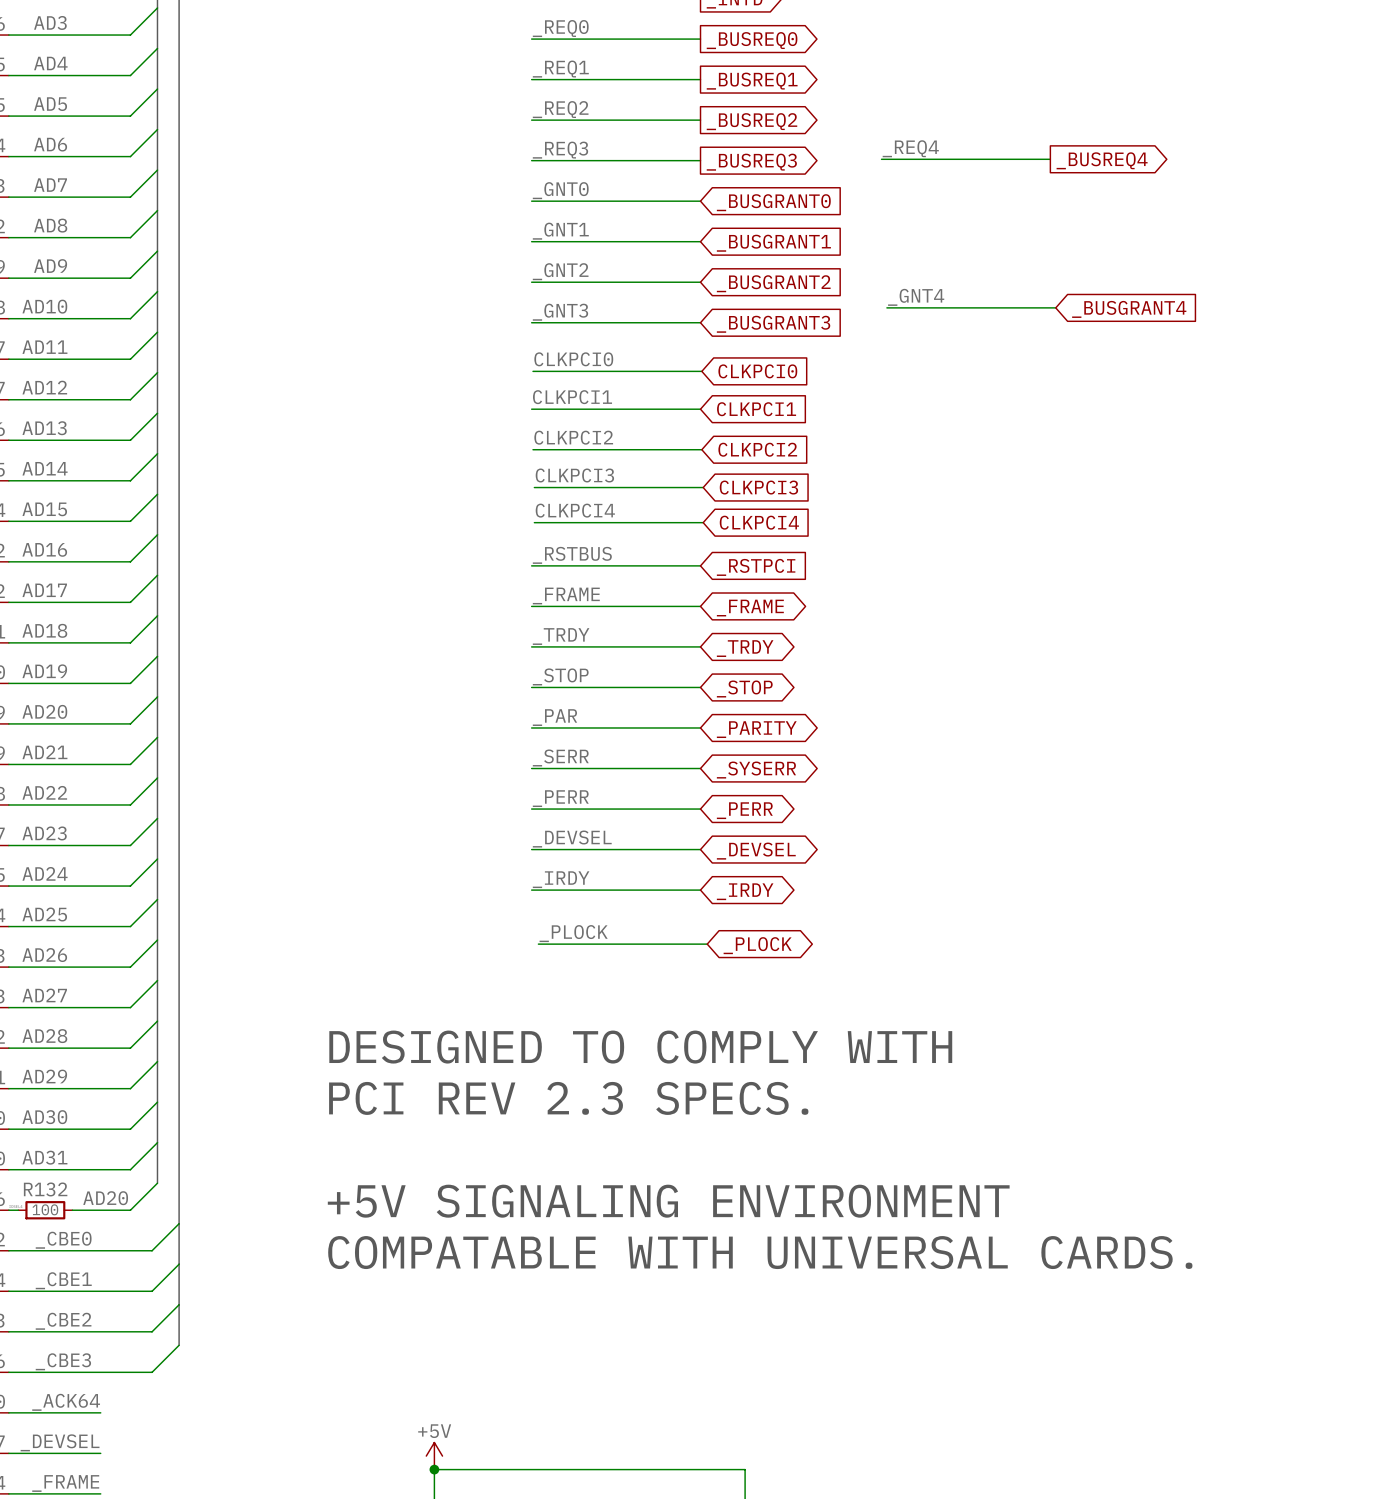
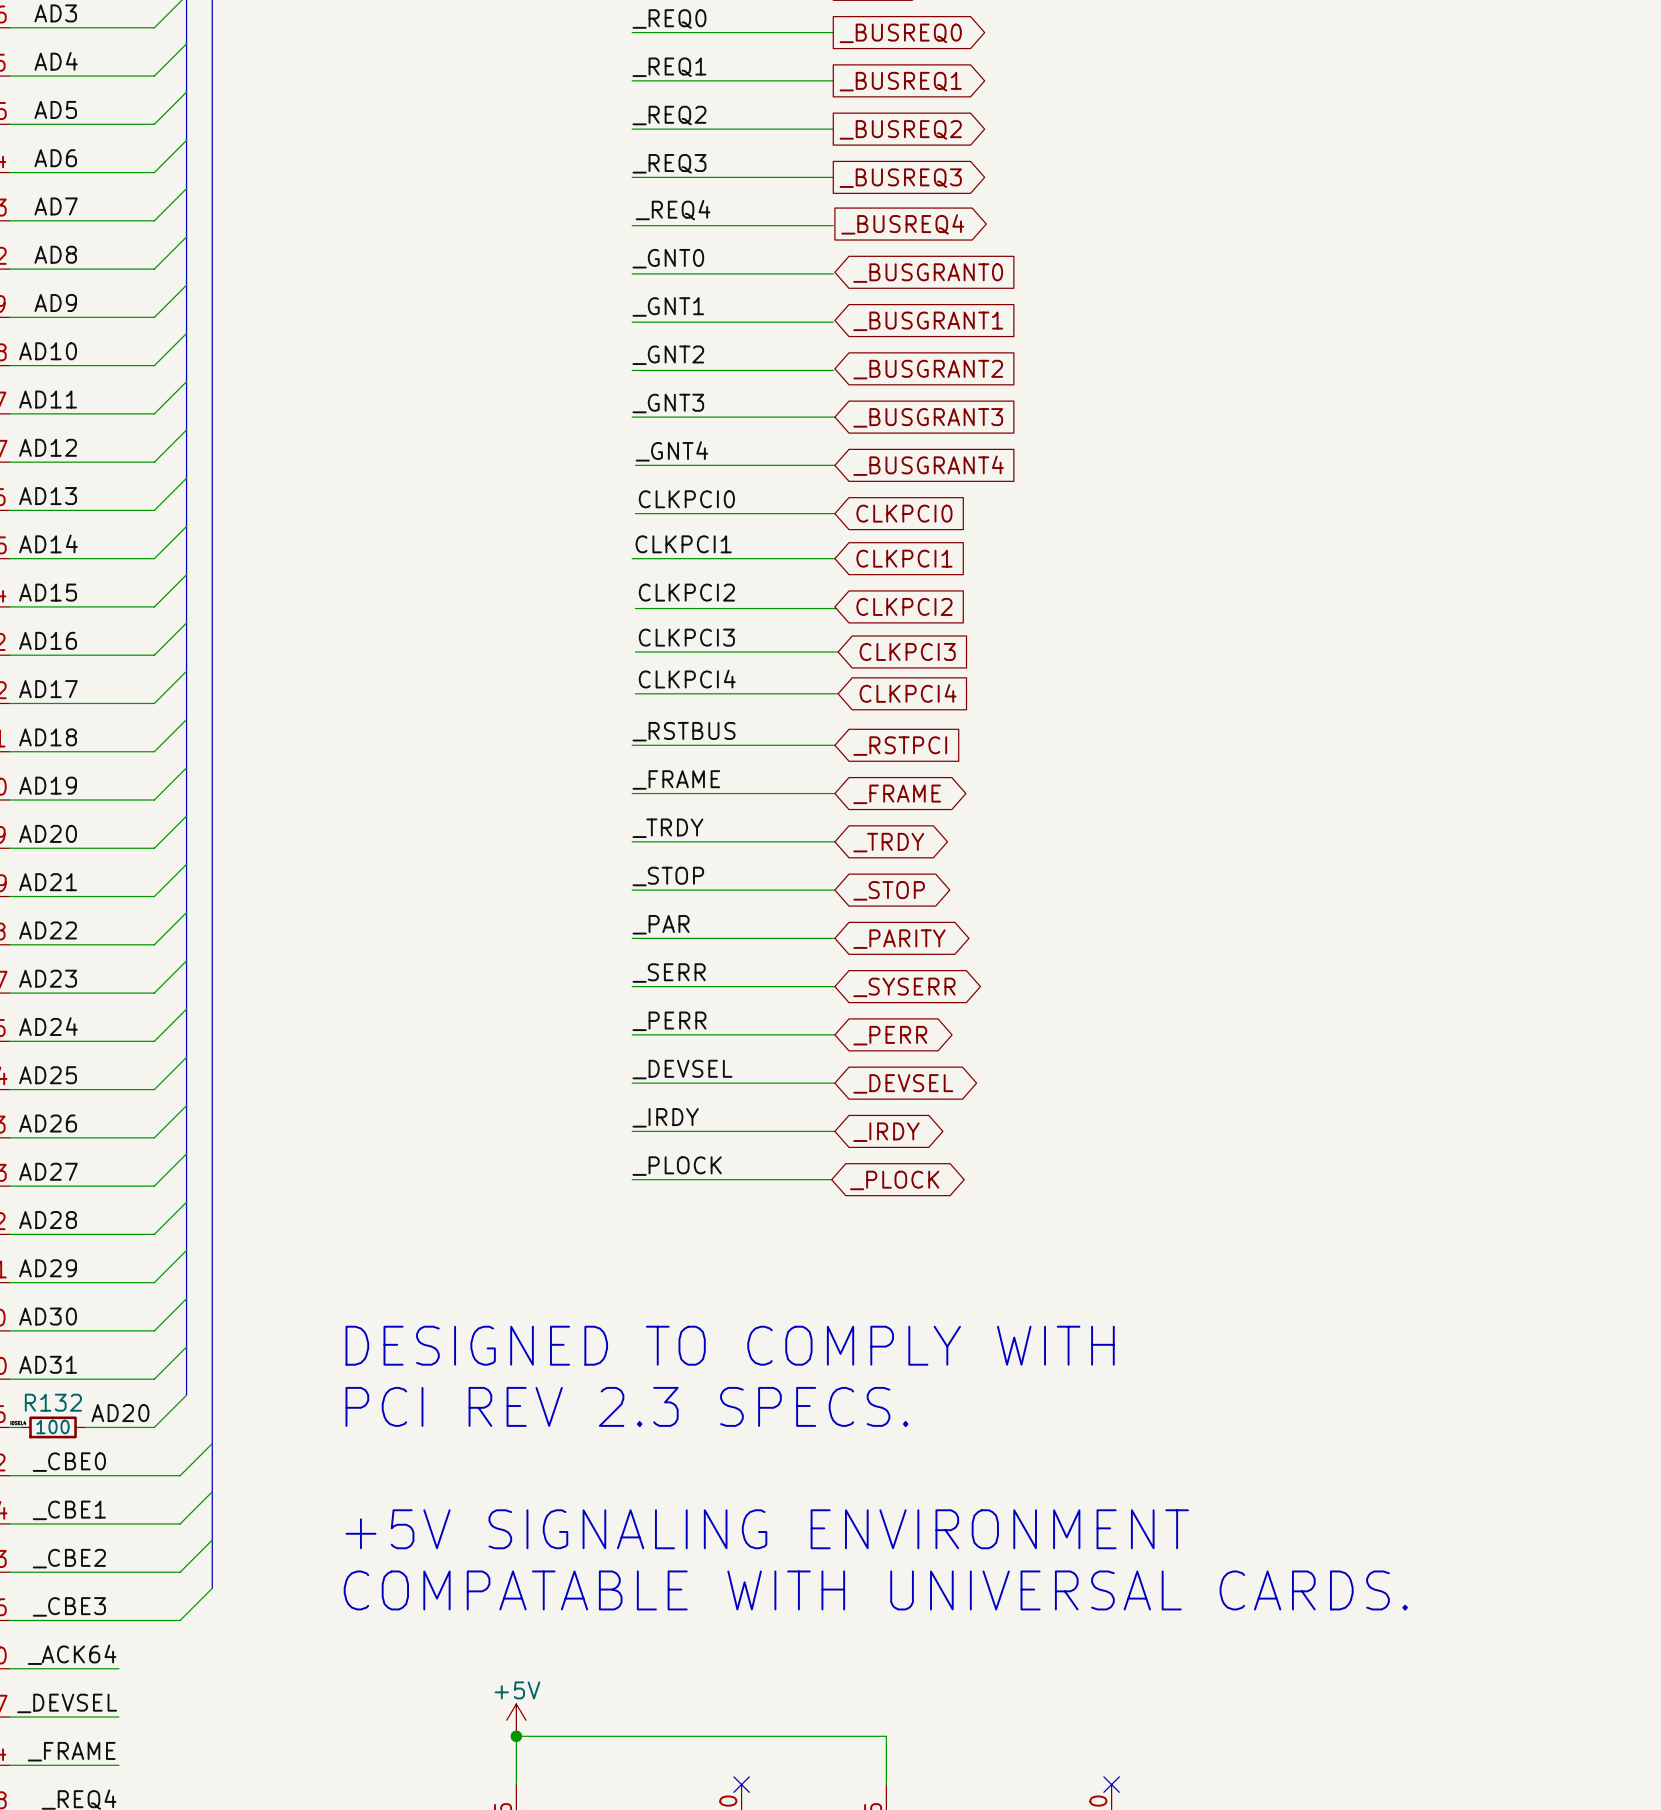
label: _REQ4 (910, 148) -> none
wire: (881, 159) (1050, 159) -> none
global label: _BUSREQ4 (1102, 160) -> none
label: none -> _REQ4 (673, 210)
label position: _GNT0 (560, 190) -> _GNT0 (668, 258)
global label: none -> _BUSREQ4 (902, 224)
global label position: _BUSGRANT0 (773, 202) -> _BUSGRANT0 (928, 273)
label position: _GNT1 (560, 231) -> _GNT1 (668, 306)
global label position: _BUSGRANT1 (773, 243) -> _BUSGRANT1 (928, 321)
label position: _GNT2 (560, 271) -> _GNT2 (668, 355)
global label position: _BUSGRANT2 (773, 283) -> _BUSGRANT2 (928, 369)
label: _GNT4 (916, 297) -> none
wire: (886, 307) (1055, 307) -> none
global label: _BUSGRANT4 (1129, 309) -> none
label position: _GNT3 (560, 312) -> _GNT3 (668, 403)
global label position: _BUSGRANT3 (773, 324) -> _BUSGRANT3 (928, 417)
label position: CLKPCI0 (573, 359) -> CLKPCI0 (686, 499)
wire: none -> (632, 417) (834, 417)
wire: (533, 371) (701, 371) -> none
global label position: CLKPCI0 (757, 371) -> CLKPCI0 (904, 513)
label: none -> _GNT4 (671, 451)
label position: CLKPCI1 (572, 397) -> CLKPCI1 (683, 544)
wire: none -> (635, 465) (834, 465)
global label: none -> _BUSGRANT4 (928, 465)
wire: (531, 409) (700, 409) -> none
global label position: CLKPCI1 (756, 409) -> CLKPCI1 (904, 558)
label position: CLKPCI2 (573, 437) -> CLKPCI2 (686, 592)
wire: none -> (635, 513) (834, 513)
wire: (533, 449) (701, 449) -> none
global label position: CLKPCI2 (757, 449) -> CLKPCI2 (904, 606)
label position: CLKPCI3 (574, 475) -> CLKPCI3 (686, 637)
wire: none -> (632, 558) (834, 558)
wire: (534, 487) (703, 487) -> none
global label position: CLKPCI3 (758, 487) -> CLKPCI3 (907, 651)
label position: CLKPCI4 (575, 510) -> CLKPCI4 (687, 679)
global label position: CLKPCI4 (759, 522) -> CLKPCI4 (908, 693)
label position: _RSTBUS (572, 555) -> _RSTBUS (684, 731)
wire: none -> (635, 651) (838, 651)
wire: (531, 565) (700, 565) -> none
global label position: _RSTPCI (756, 567) -> _RSTPCI (900, 746)
wire: none -> (635, 693) (838, 693)
label position: _FRAME (566, 596) -> _FRAME (676, 779)
wire: (531, 606) (700, 606) -> none
global label position: _FRAME (750, 608) -> _FRAME (897, 794)
label position: _TRDY (561, 636) -> _TRDY (667, 828)
wire: none -> (632, 745) (834, 745)
wire: (531, 646) (700, 646) -> none
global label position: _TRDY (745, 648) -> _TRDY (888, 842)
label position: _STOP (560, 676) -> _STOP (668, 876)
wire: none -> (632, 793) (834, 793)
wire: (531, 687) (700, 687) -> none
global label position: _STOP (744, 688) -> _STOP (889, 890)
label position: _PAR (554, 717) -> _PAR (661, 924)
wire: none -> (632, 841) (834, 841)
wire: (531, 727) (700, 727) -> none
global label position: _PARITY (756, 729) -> _PARITY (899, 939)
label position: _SERR (560, 757) -> _SERR (669, 973)
wire: none -> (632, 890) (834, 890)
wire: (531, 768) (700, 768) -> none
global label position: _SYSERR (756, 770) -> _SYSERR (904, 987)
label position: _PERR (560, 798) -> _PERR (669, 1021)
wire: none -> (632, 938) (834, 938)
wire: (531, 809) (700, 809) -> none
global label position: _PERR (744, 810) -> _PERR (890, 1035)
label position: _DEVSEL (572, 839) -> _DEVSEL (682, 1069)
wire: none -> (632, 986) (834, 986)
wire: (531, 849) (700, 849) -> none
global label position: _DEVSEL (756, 851) -> _DEVSEL (903, 1083)
label position: _IRDY (561, 879) -> _IRDY (665, 1117)
wire: none -> (632, 1034) (834, 1034)
wire: (531, 890) (700, 890) -> none
global label position: _IRDY (745, 891) -> _IRDY (886, 1132)
wire: none -> (632, 1083) (834, 1083)
label position: _PLOCK (573, 933) -> _PLOCK (677, 1166)
wire: (538, 944) (707, 944) -> none
global label position: _PLOCK (757, 945) -> _PLOCK (894, 1180)
wire: none -> (632, 1131) (834, 1131)
wire: none -> (632, 1179) (831, 1179)
text position: DESIGNED TO COMPLY WITH (640, 1047) -> DESIGNED TO COMPLY WITH (730, 1345)
text position: PCI REV 2.3 SPECS. (568, 1098) -> PCI REV 2.3 SPECS. (626, 1406)
text position: +5V SIGNALING ENVIRONMENT (668, 1201) -> +5V SIGNALING ENVIRONMENT (767, 1529)
text position: COMPATABLE WITH UNIVERSAL CARDS. (760, 1252) -> COMPATABLE WITH UNIVERSAL CARDS. (875, 1590)

